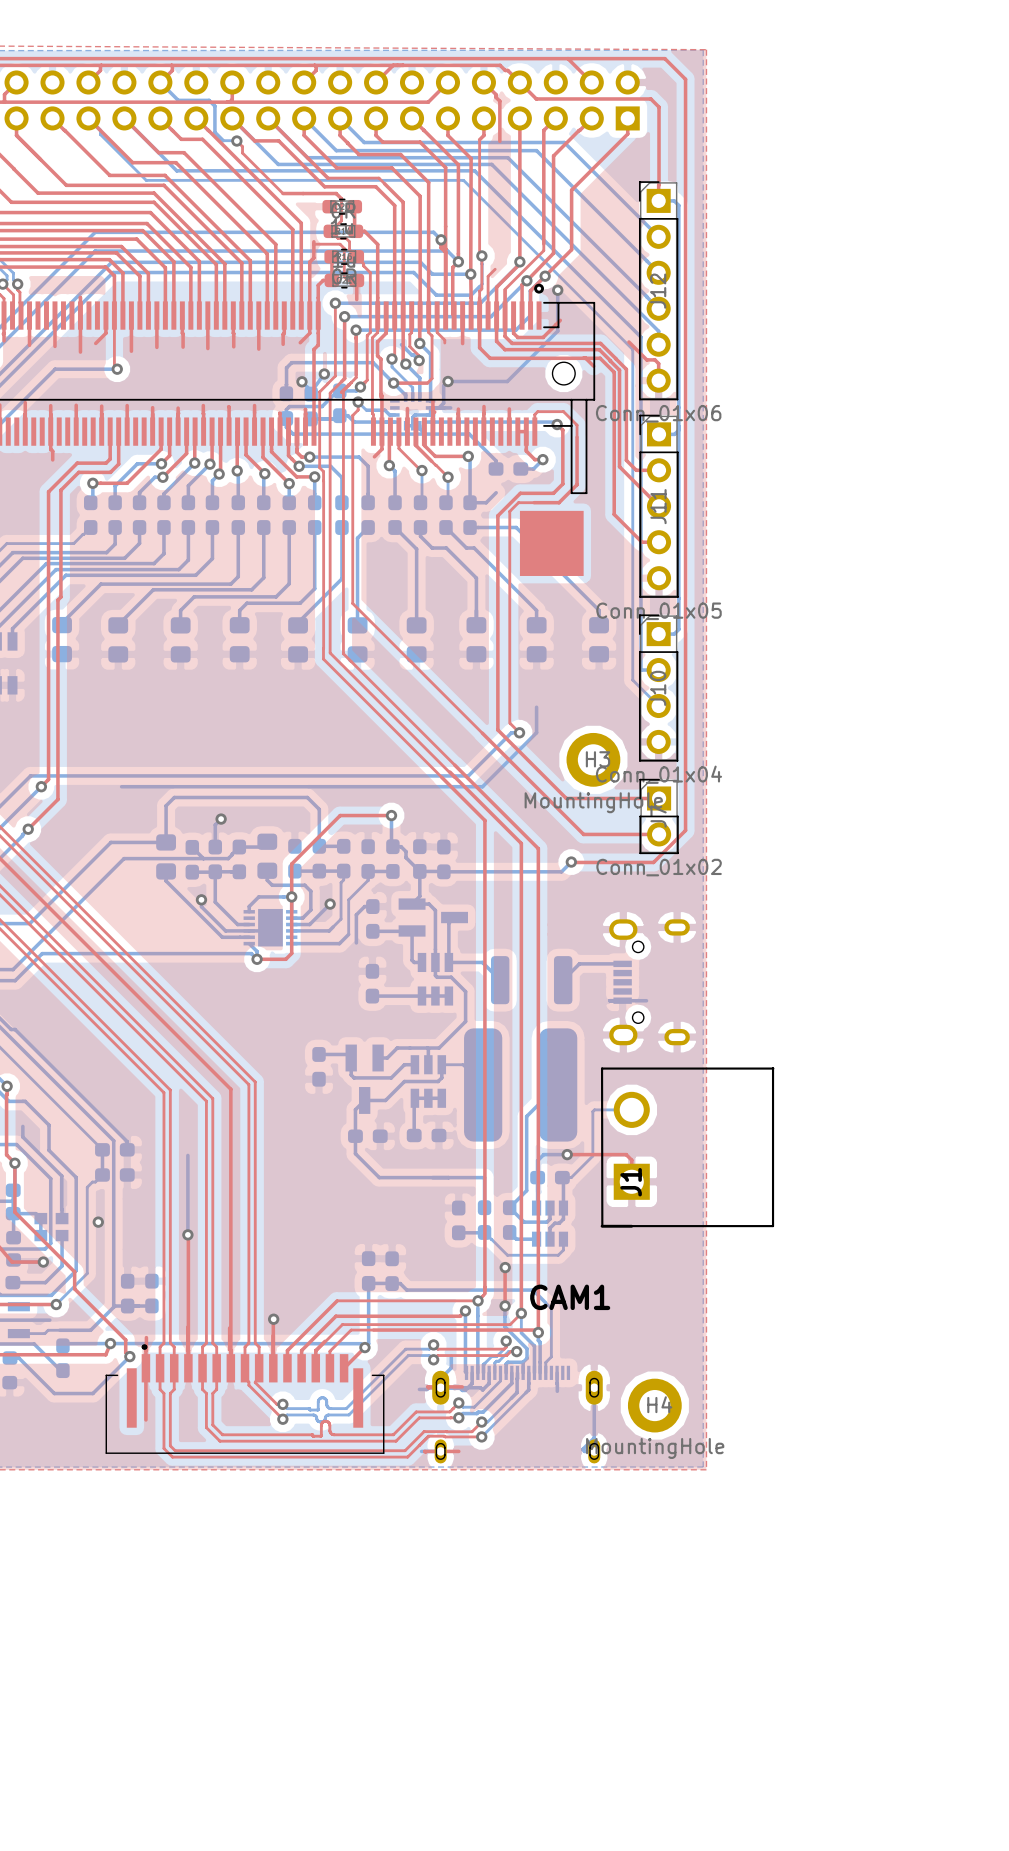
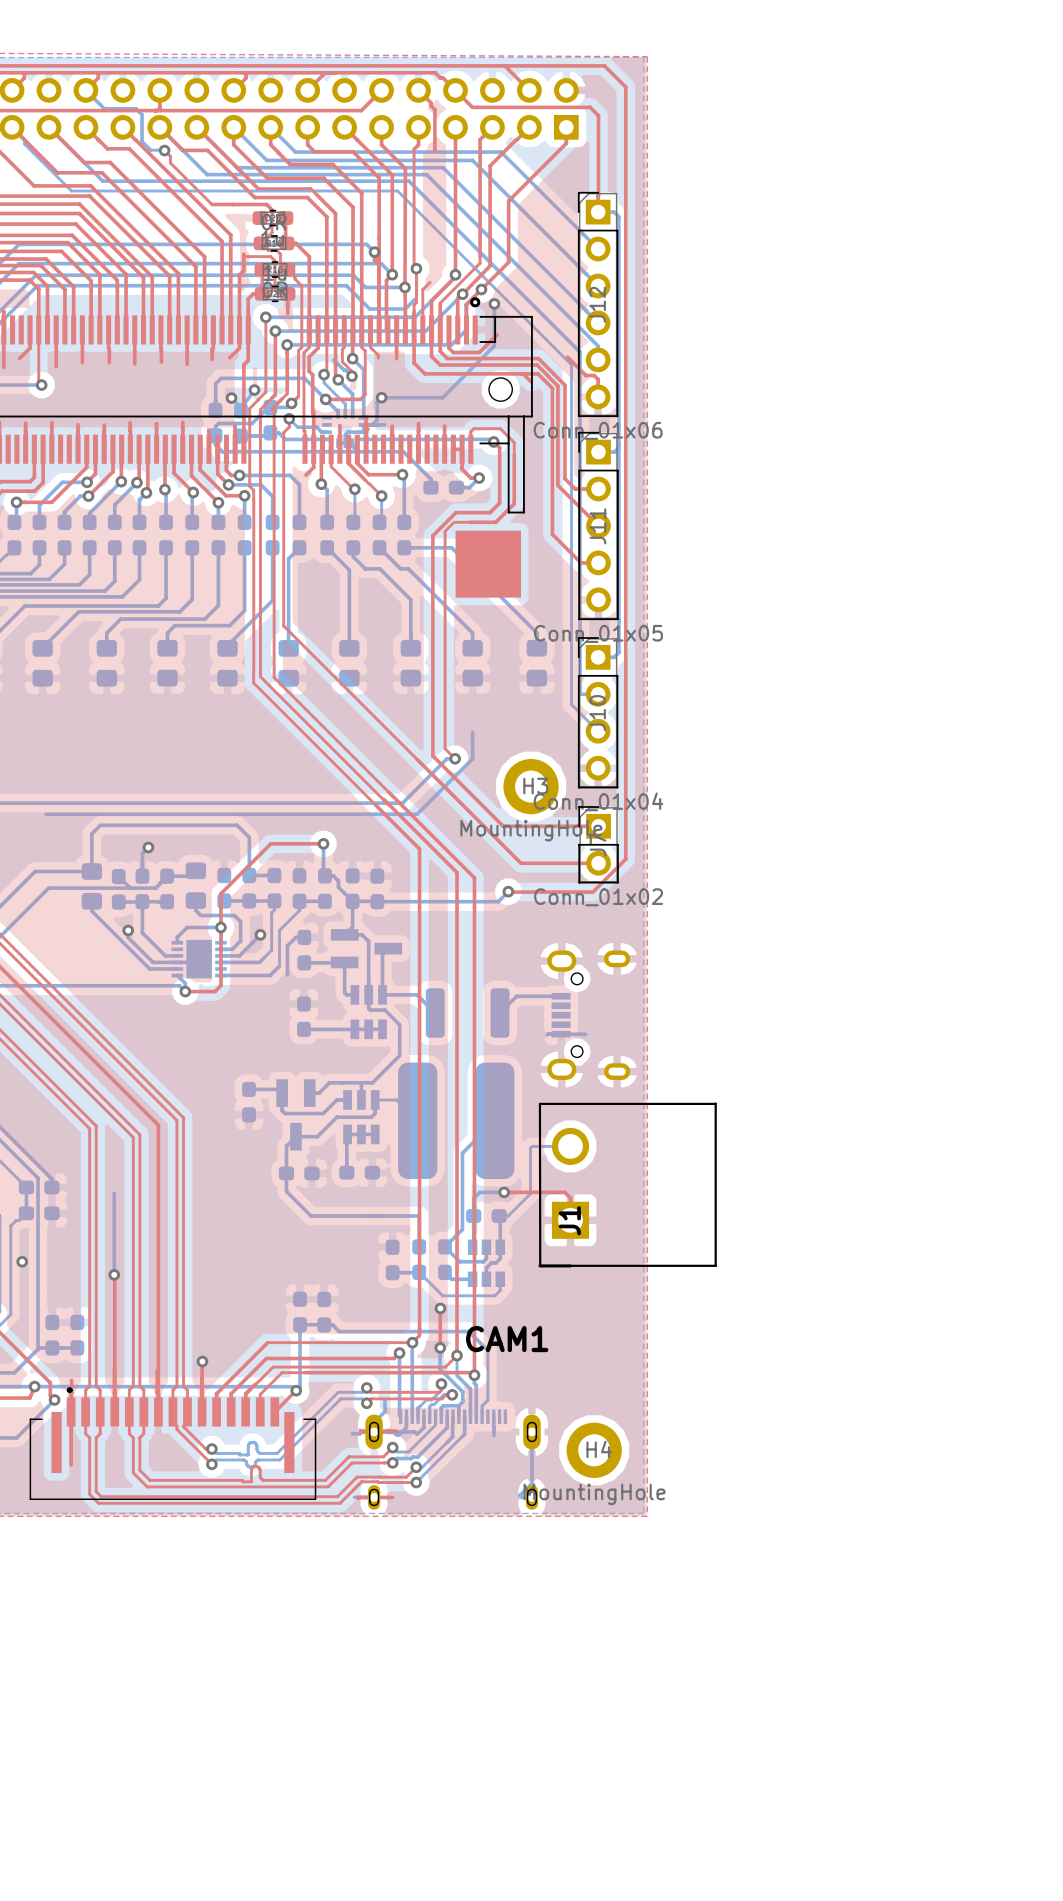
bottom track: (496, 492) (486, 502) (470, 502) -> none

